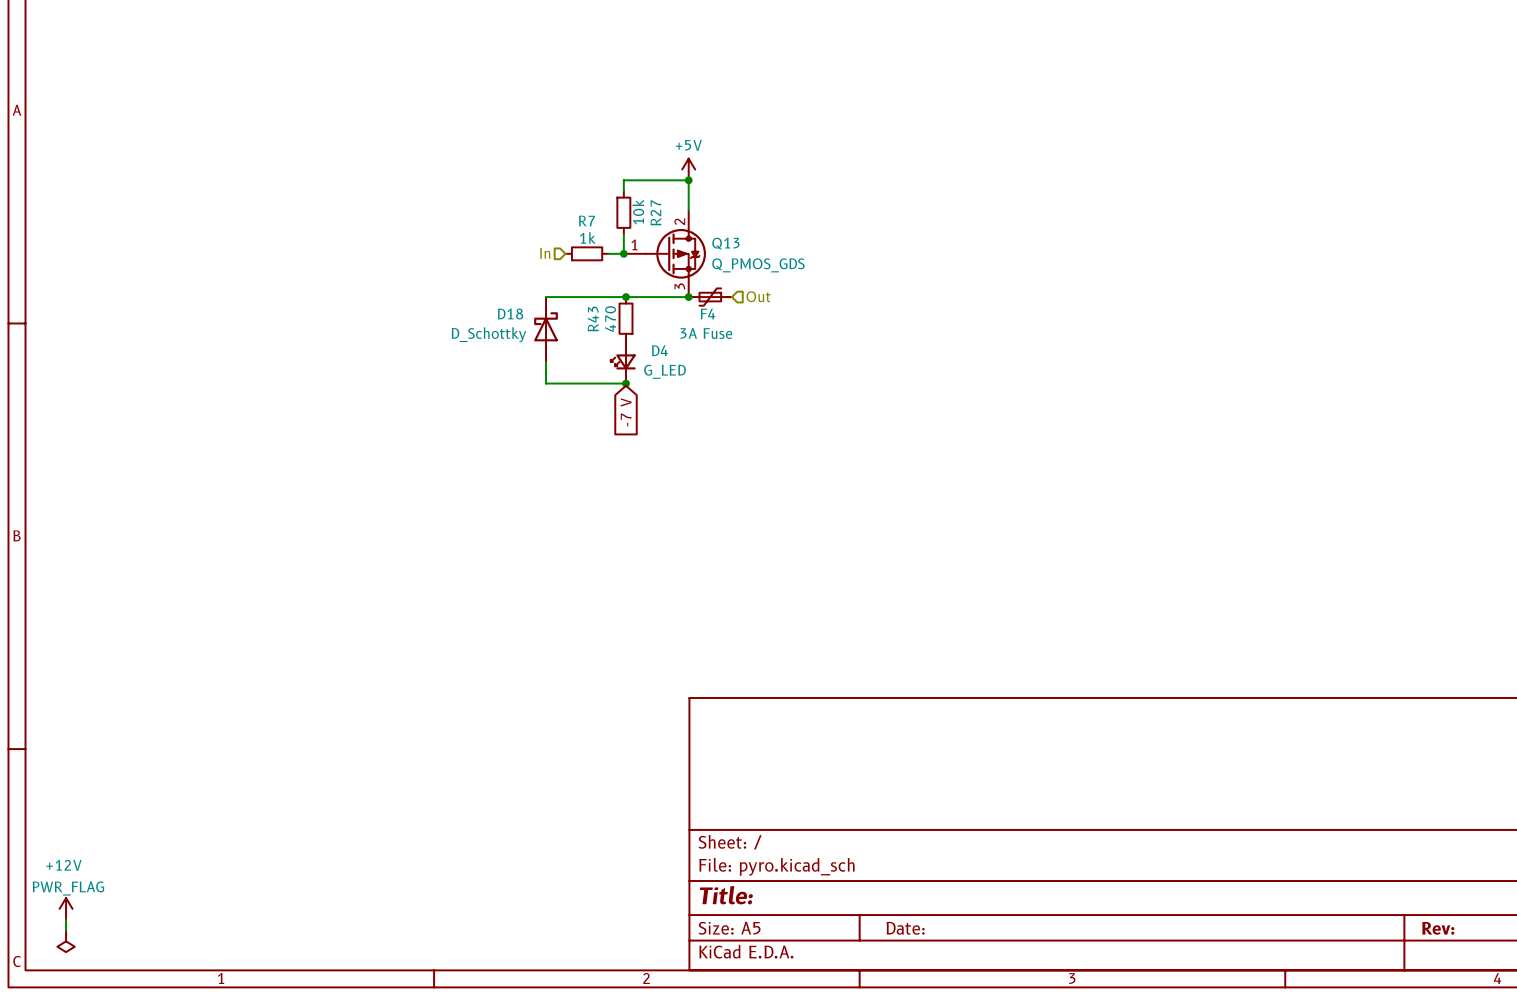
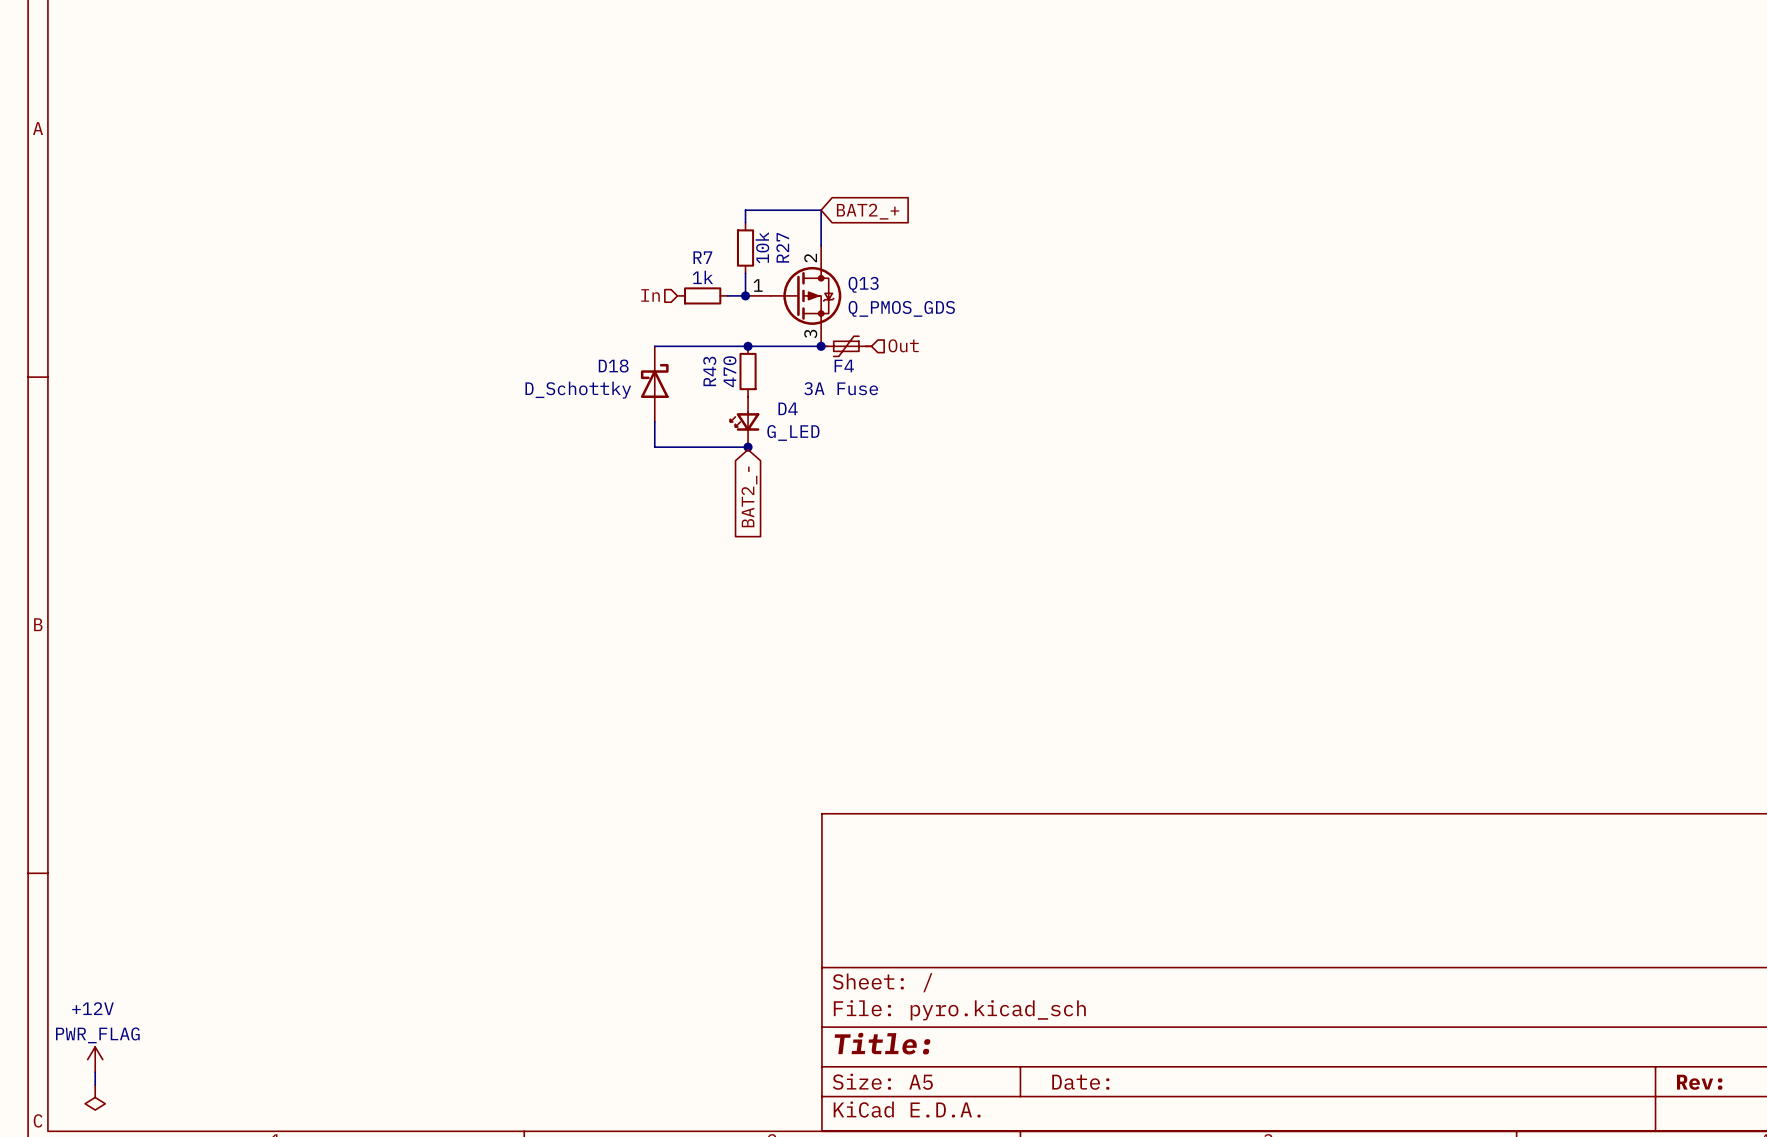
power symbol: +5V (688, 169) -> none
junction: (688, 180) -> none
global label: none -> BAT2_+ (868, 211)
global label: -7 V (626, 412) -> BAT2_- (749, 496)

